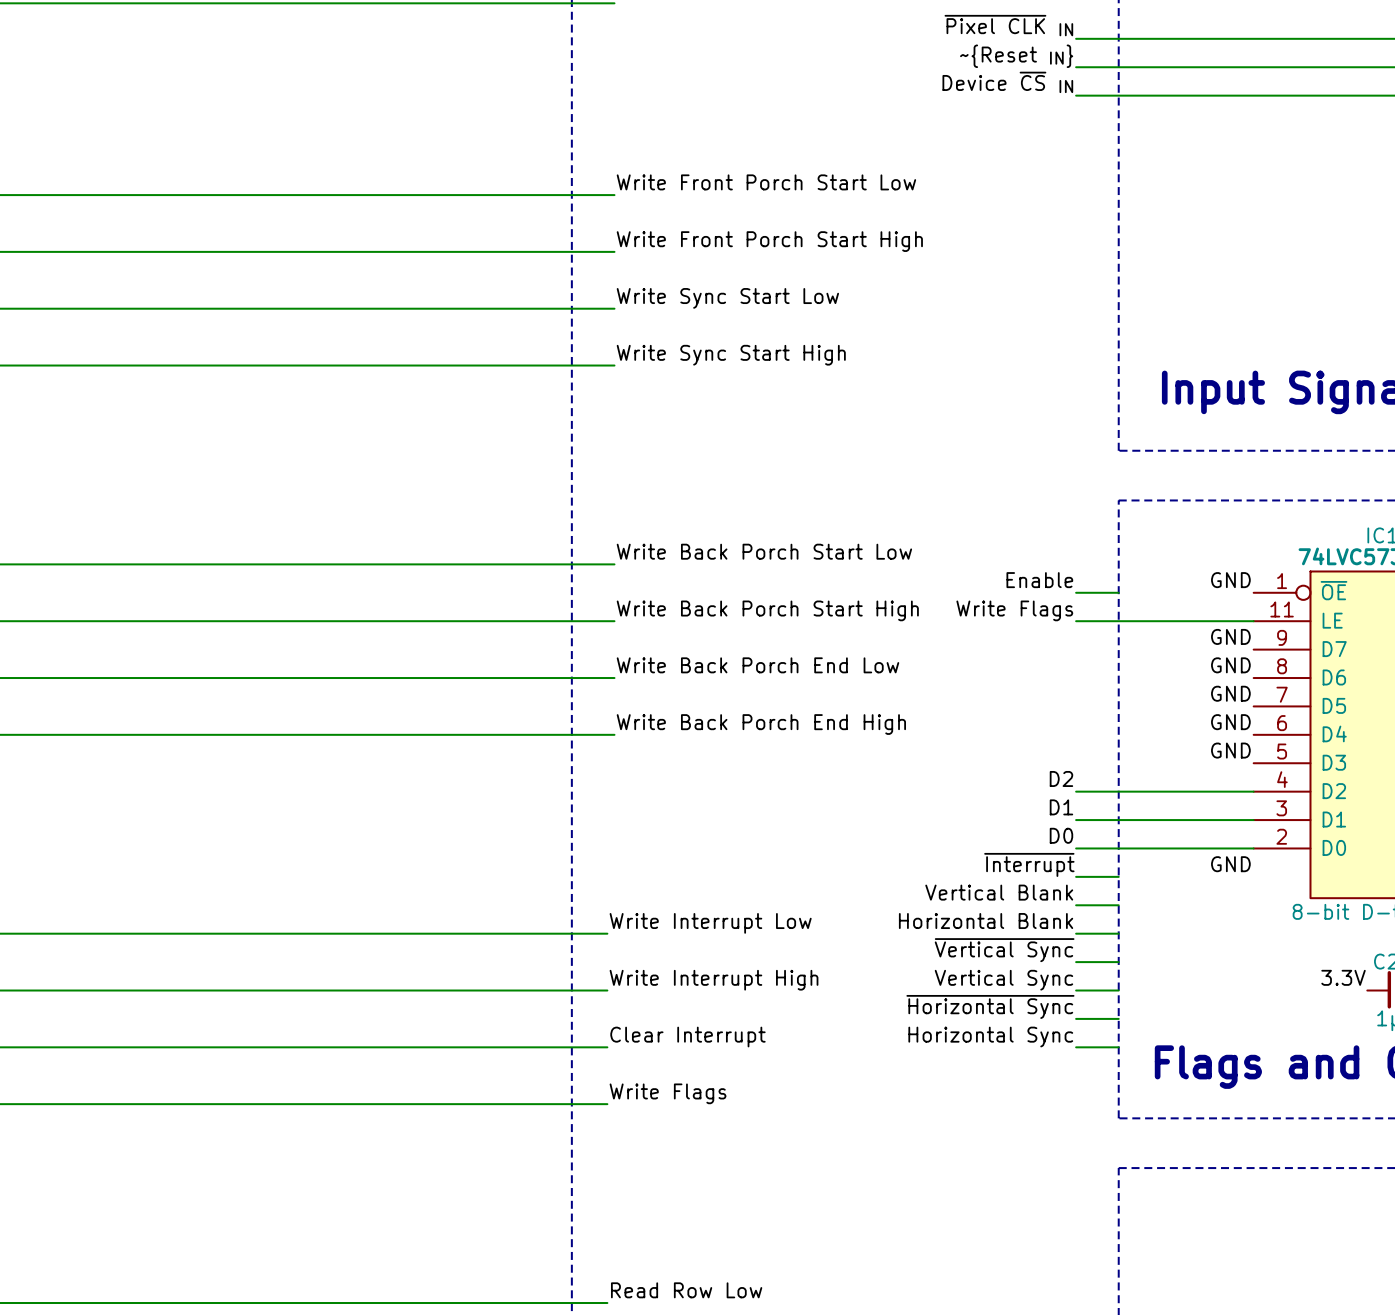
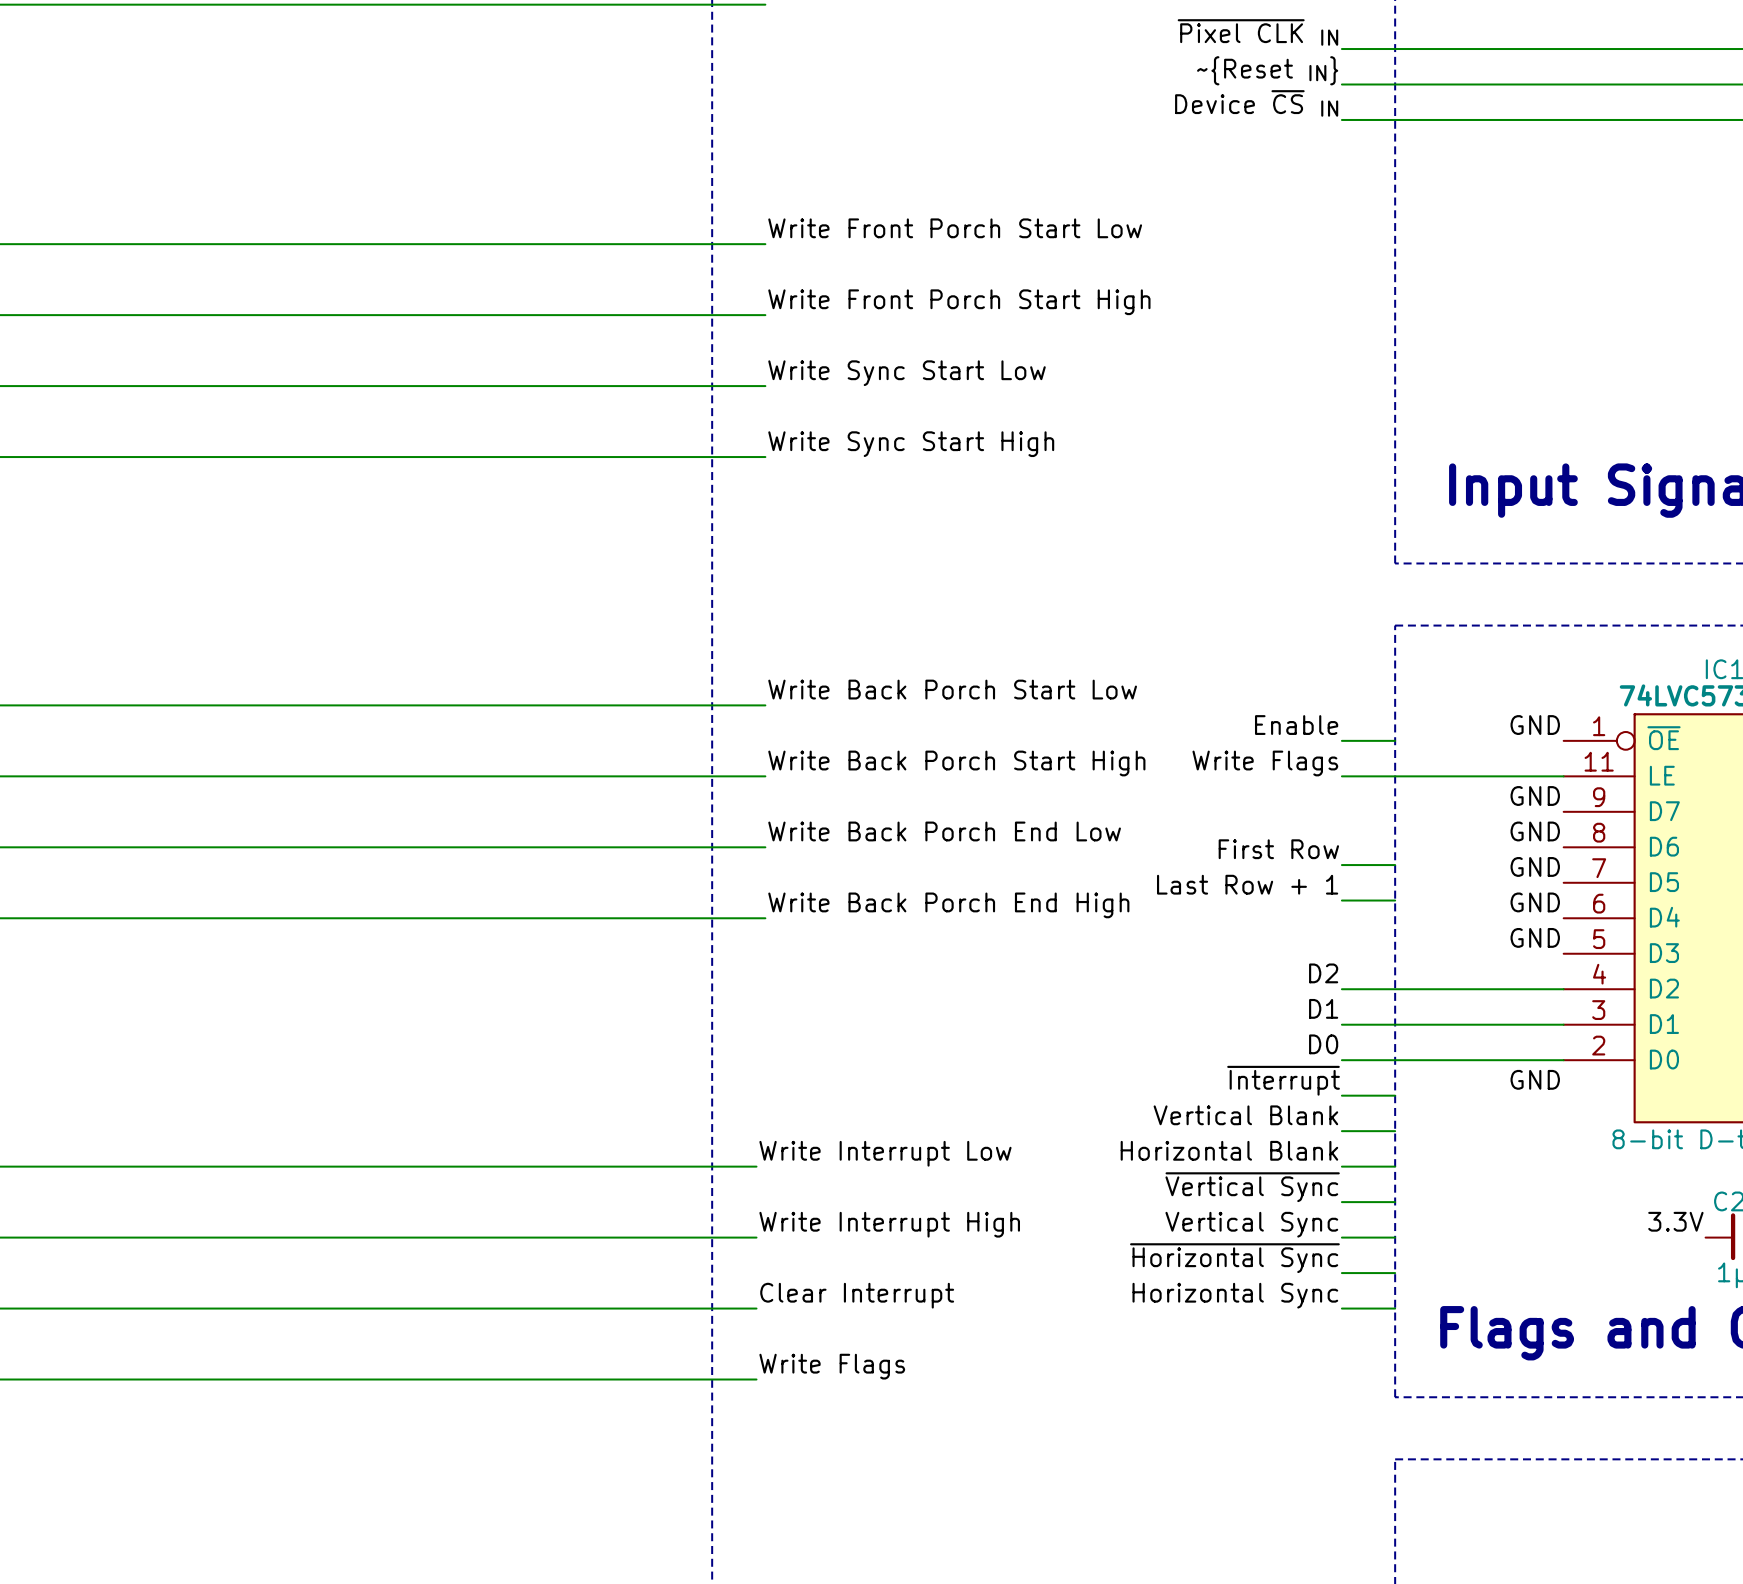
label: none -> First Row (1278, 849)
wire: none -> (1341, 865) (1395, 865)
label: none -> Last Row + 1 (1247, 884)
wire: none -> (1341, 900) (1395, 900)

